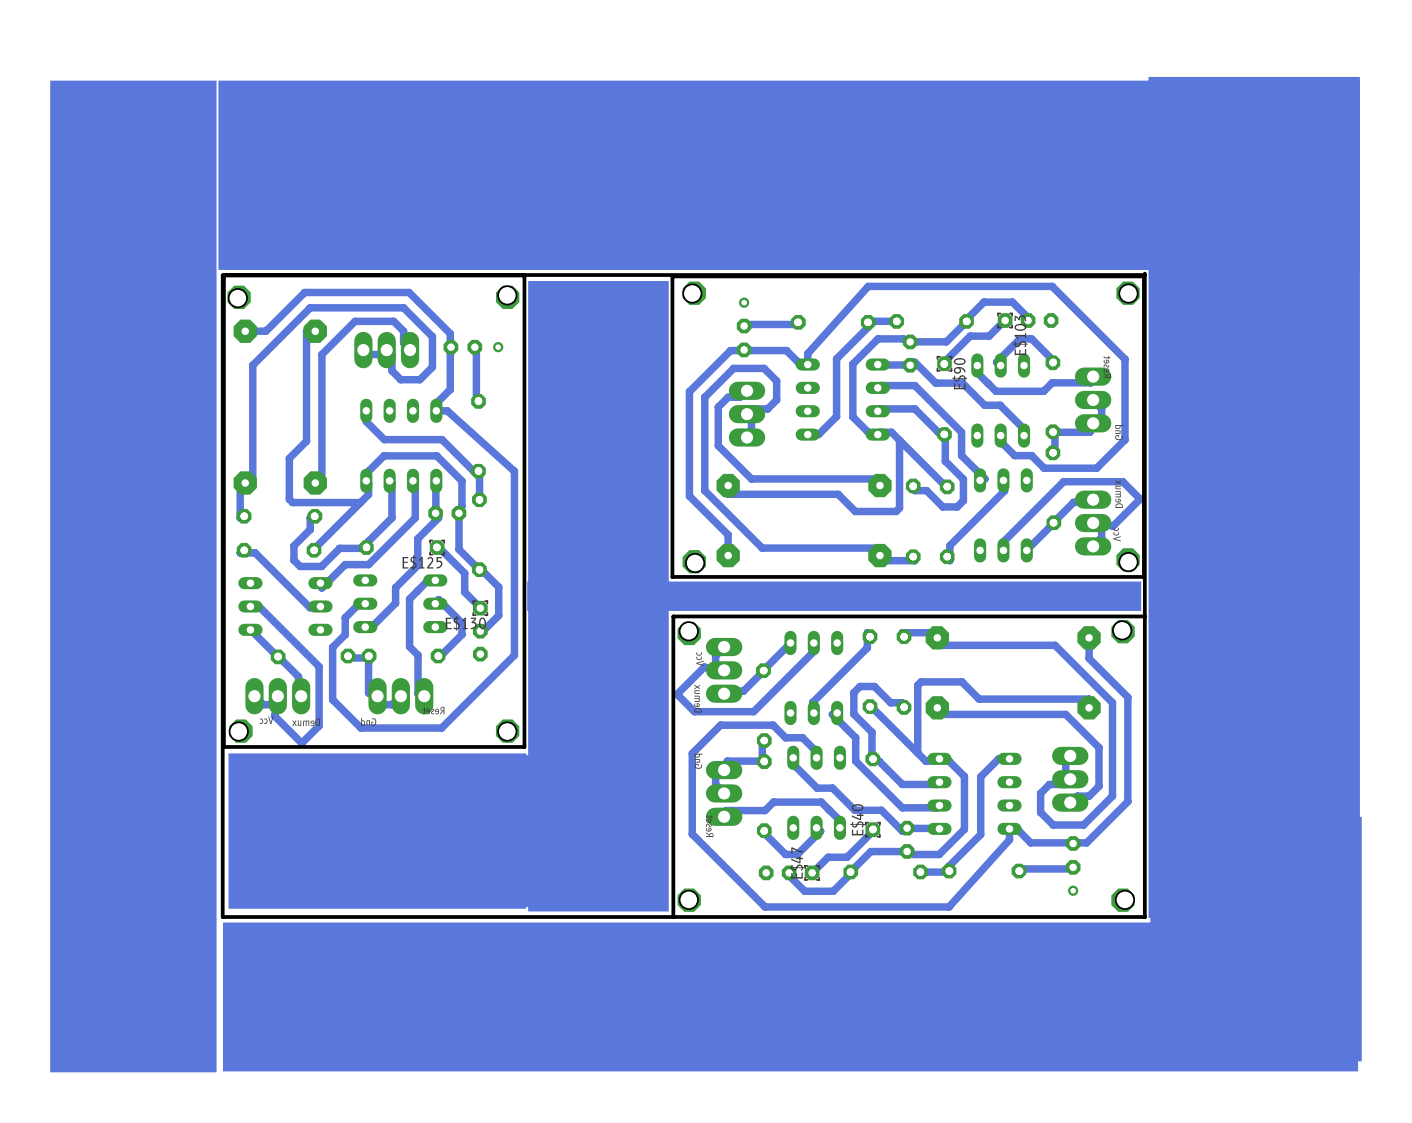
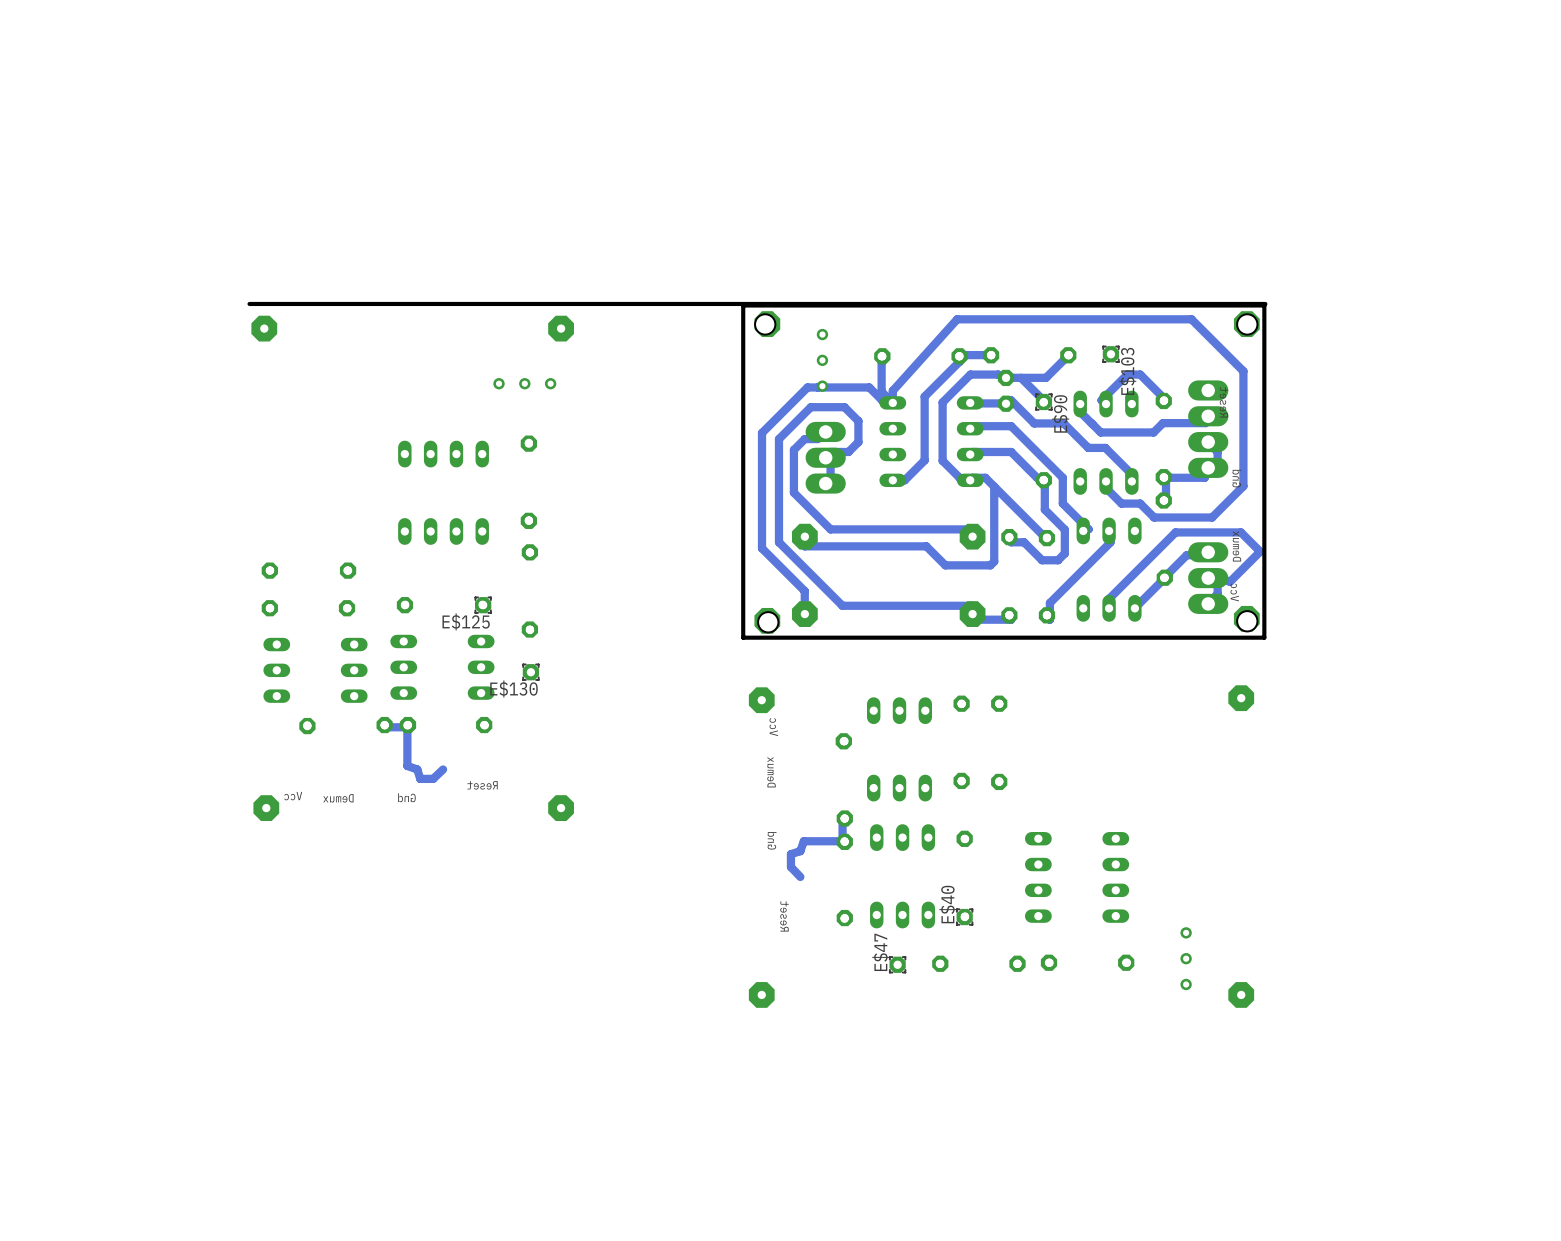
drawing: [50, 76, 1362, 1073] -> none
board edge: (1144, 273) (1144, 917) (222, 917) (222, 275) -> none
board edge: (524, 275) (524, 746) (223, 746) (223, 275) (524, 275) -> none
bottom track: (866, 288) (868, 286) (1052, 286) (1124, 359) -> (957, 319) (1191, 319) (1243, 371) (1243, 397)
hole: (507, 295) -> none
hole: (237, 298) -> none
bottom track: (966, 319) (984, 302) (1012, 302) (1028, 317) (1028, 320) -> none
bottom track: (1004, 320) (989, 336) (970, 336) (944, 362) -> (1005, 377) (1020, 377) (1043, 400)
part: (1028, 320) -> none
part: (1051, 320) -> none
bottom track: (797, 322) (797, 324) (745, 324) (744, 326) -> (881, 356) (881, 391) (892, 402)
part: (744, 326) -> none
bottom track: (245, 331) (266, 331) (304, 292) (409, 292) (450, 333) (450, 389) (438, 401) (436, 410) (447, 410) (514, 471) (514, 655) (441, 728) (360, 728) (332, 699) (332, 647) (345, 634) (345, 617) (359, 603) (365, 603) -> none
part: (245, 331) -> none
bottom track: (315, 331) (306, 331) (306, 441) (289, 458) (289, 499) (292, 502) (360, 502) -> none
part: (315, 331) -> none
part: (450, 347) -> none
bottom track: (474, 347) (476, 348) (476, 400) (478, 400) -> none
part: (474, 347) -> none
part: (744, 349) -> none
bottom track: (363, 350) (368, 354) (380, 354) (386, 350) (391, 354) (391, 370) (400, 379) (419, 379) (432, 367) (432, 336) (403, 307) (310, 307) (252, 365) (252, 482) (240, 482) (240, 517) (244, 516) -> none
part: (363, 350) -> none
part: (386, 350) -> none
bottom track: (410, 350) (403, 342) (403, 331) (393, 321) (355, 321) (321, 354) (321, 482) (315, 483) -> none
part: (410, 350) -> none
part: none -> (1208, 390)
bottom track: (366, 410) (366, 421) (384, 439) (442, 439) (473, 471) (479, 471) (479, 499) -> none
bottom track: (389, 480) (391, 482) (391, 517) (368, 541) (367, 548) (339, 548) (321, 566) (300, 566) (293, 560) (293, 545) (310, 529) (310, 517) (314, 516) -> none
bottom track: (412, 480) (415, 482) (415, 517) (368, 564) (345, 564) (321, 587) (320, 583) -> none
bottom track: (436, 480) (435, 513) (438, 517) (417, 538) (417, 565) (395, 587) (395, 603) (371, 627) (365, 627) -> none
part: (245, 483) -> none
part: (315, 483) -> none
part: (447, 513) -> none
bottom track: (458, 513) (461, 506) (461, 481) (436, 455) (383, 455) (368, 471) (366, 480) (368, 482) (368, 494) (314, 550) -> none
bottom track: (459, 513) (459, 549) (498, 587) (498, 615) (483, 631) (480, 631) -> none
bottom track: (436, 547) (464, 573) (464, 592) (480, 607) -> none
bottom track: (244, 550) (240, 552) (255, 552) (310, 607) (320, 606) -> none
bottom track: (435, 580) (427, 580) (409, 599) (409, 646) (418, 655) (418, 694) (424, 696) -> none
bottom track: (435, 603) (438, 599) (461, 622) (461, 634) (438, 658) (438, 656) -> none
bottom track: (250, 606) (258, 606) (319, 666) (319, 725) (301, 743) (274, 715) (277, 704) (263, 704) (254, 696) -> none
board edge: (1144, 616) (673, 616) (673, 917) -> none
bottom track: (250, 629) (298, 676) (298, 693) (301, 696) -> none
hole: (1122, 630) -> none
part: (480, 631) -> none
hole: (688, 631) -> none
bottom track: (870, 636) (867, 632) (867, 647) (812, 702) (813, 713) -> none
bottom track: (904, 636) (902, 632) (937, 632) (937, 645) (1055, 645) (1112, 702) (1112, 796) (1083, 825) (1053, 825) (1040, 812) (1040, 793) (1049, 784) (1065, 784) (1070, 779) (1065, 772) (1065, 761) (1070, 755) -> none
part: (937, 637) -> none
bottom track: (1089, 637) (1089, 658) (1127, 697) (1127, 801) (1086, 842) (1030, 842) (1019, 831) (1009, 828) (1009, 839) (949, 906) (765, 906) (692, 834) (692, 753) (720, 725) (773, 725) (785, 737) (802, 737) (817, 752) (816, 757) -> none
part: (1089, 637) -> none
bottom track: (790, 642) (764, 670) -> none
bottom track: (813, 642) (813, 651) (753, 711) (694, 711) (677, 694) (704, 667) (715, 670) (715, 656) (724, 647) -> none
part: (724, 647) -> none
part: (480, 654) -> none
part: (724, 670) -> none
bottom track: (764, 670) (743, 691) (727, 691) (724, 693) -> none
part: (724, 693) -> none
part: (254, 696) -> none
part: (277, 696) -> none
part: (301, 696) -> none
part: (377, 696) -> none
part: (400, 696) -> none
part: (424, 696) -> none
bottom track: (870, 706) (925, 761) (937, 761) (939, 758) (949, 761) (964, 776) (964, 829) (939, 854) (914, 854) (907, 851) -> none
bottom track: (904, 706) (902, 702) (890, 702) (874, 686) (860, 686) (853, 692) (853, 714) (871, 732) (871, 759) (879, 761) (902, 784) (937, 784) (939, 782) -> none
bottom track: (937, 707) (937, 714) (1065, 714) (1098, 747) (1098, 786) (1089, 796) (1077, 796) (1070, 802) -> none
part: (937, 707) -> none
bottom track: (1089, 707) (1089, 699) (979, 699) (961, 681) (921, 681) (917, 685) (917, 753) -> none
part: (1089, 707) -> none
bottom track: (837, 713) (832, 714) (855, 737) (855, 761) (902, 807) (937, 807) (939, 805) -> none
hole: (238, 731) -> none
hole: (507, 731) -> none
part: (1070, 755) -> none
bottom track: (793, 757) (793, 764) (817, 788) (832, 788) (854, 810) (881, 810) (902, 831) (907, 828) (939, 828) -> none
bottom track: (1009, 758) (998, 758) (980, 776) (980, 834) (949, 866) (948, 872) (920, 872) -> none
part: (724, 770) -> none
part: (1070, 779) -> none
part: (724, 793) -> none
part: (1070, 802) -> none
bottom track: (724, 816) (726, 810) (765, 810) (773, 802) (821, 802) (839, 820) (839, 827) -> none
part: (724, 816) -> none
bottom track: (816, 827) (820, 831) (797, 854) (785, 854) (762, 831) (764, 831) -> none
bottom track: (873, 829) (847, 857) (828, 857) (812, 872) -> none
part: (907, 839) -> none
part: (1073, 843) -> none
bottom track: (907, 851) (870, 851) (833, 891) (804, 891) (789, 875) (789, 872) -> none
bottom track: (1073, 867) (1071, 868) (1019, 868) (1019, 871) -> none
part: (1073, 867) -> none
part: (766, 872) -> none
part: (789, 872) -> none
hole: (688, 899) -> none
hole: (1124, 899) -> none

